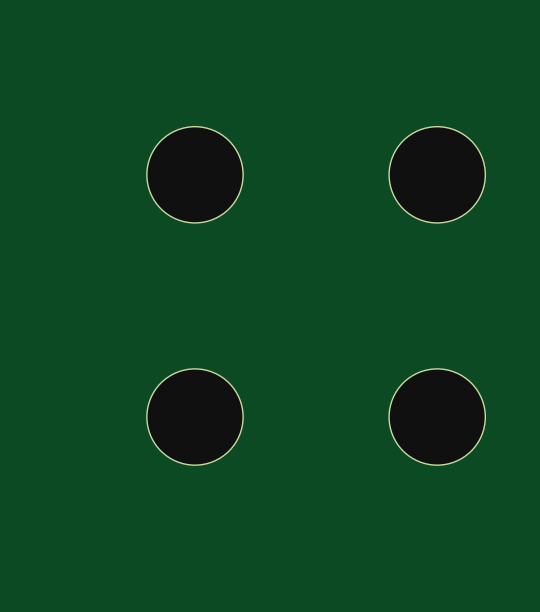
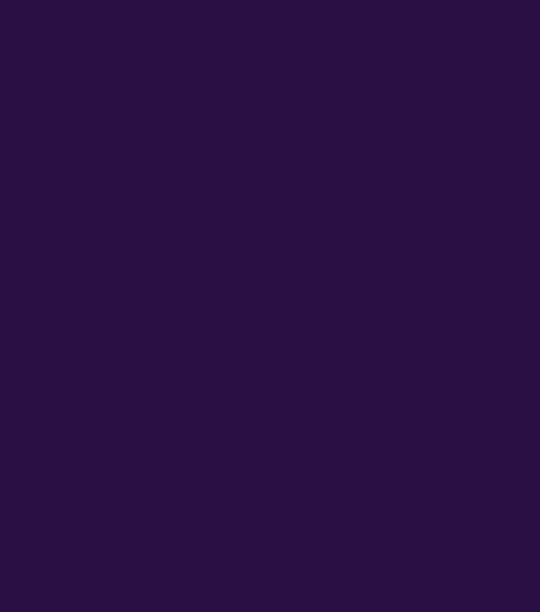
part: (194, 174) -> none
part: (437, 174) -> none
part: (194, 417) -> none
part: (437, 417) -> none

